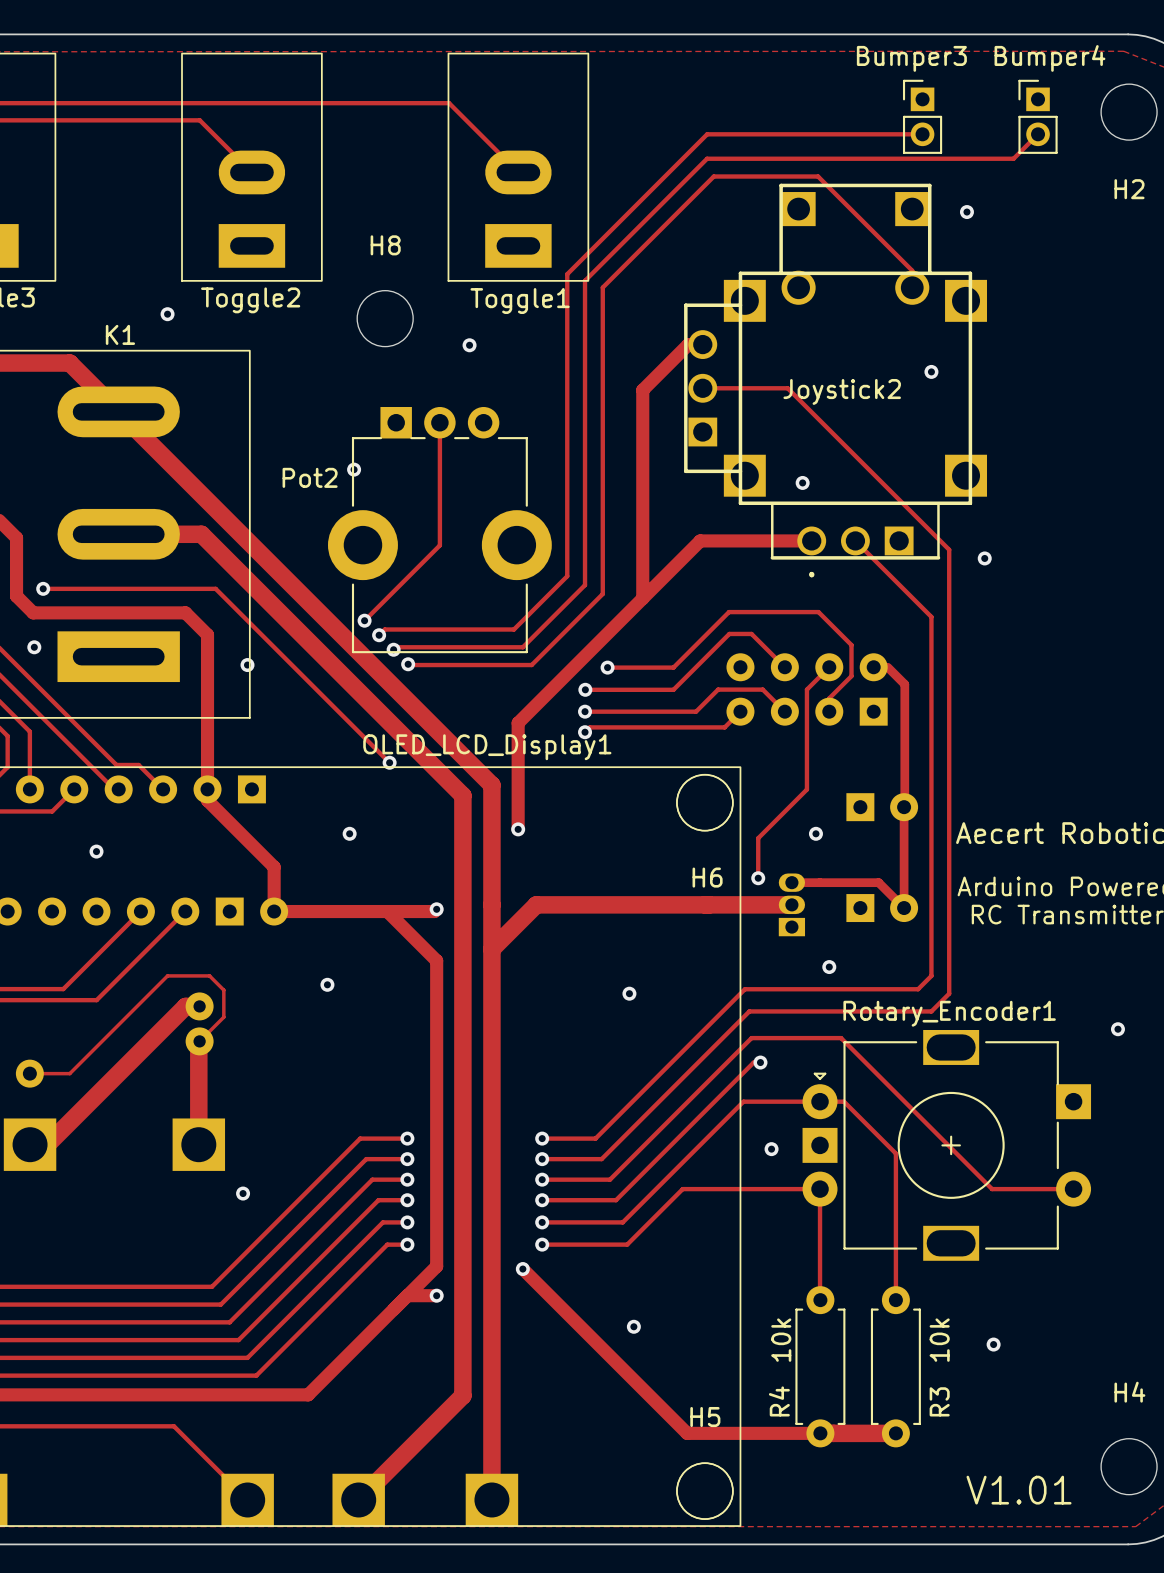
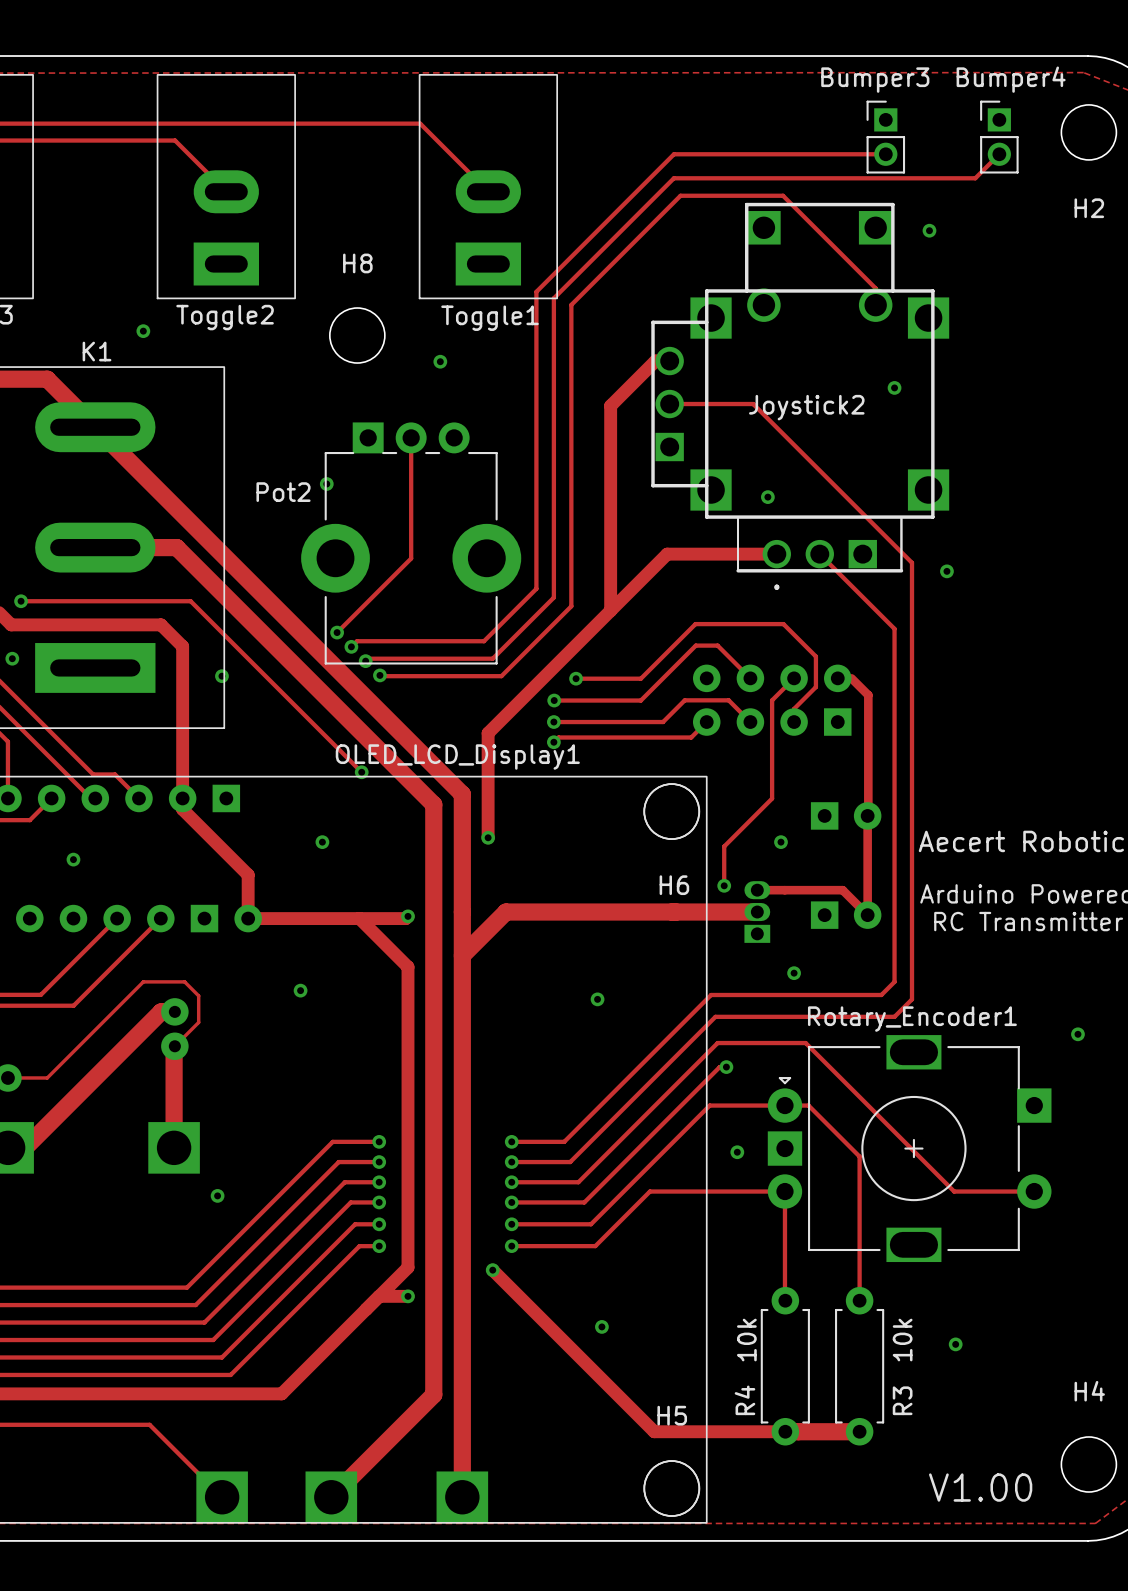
text: V1.01 (1019, 1490) -> V1.00 (980, 1487)

